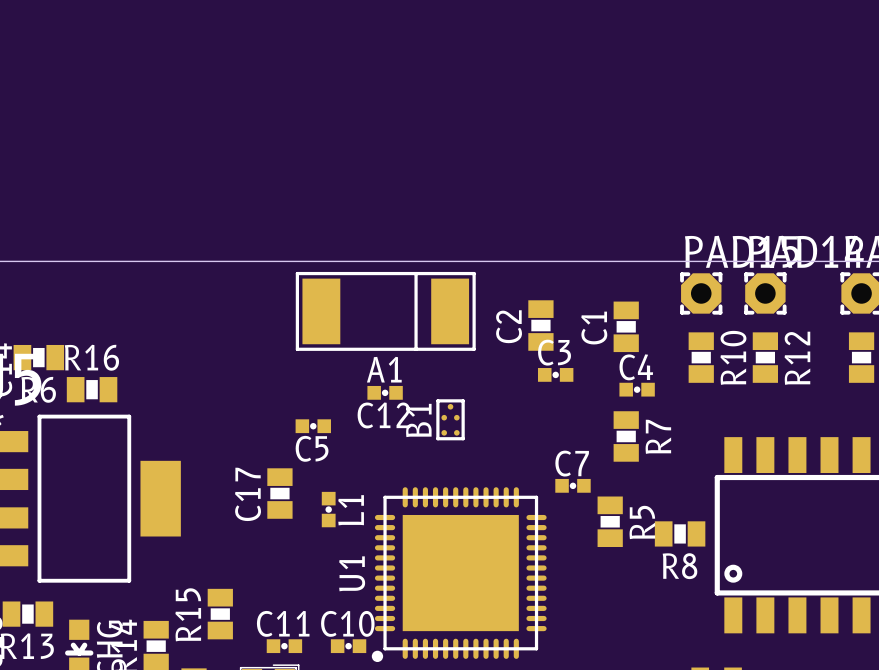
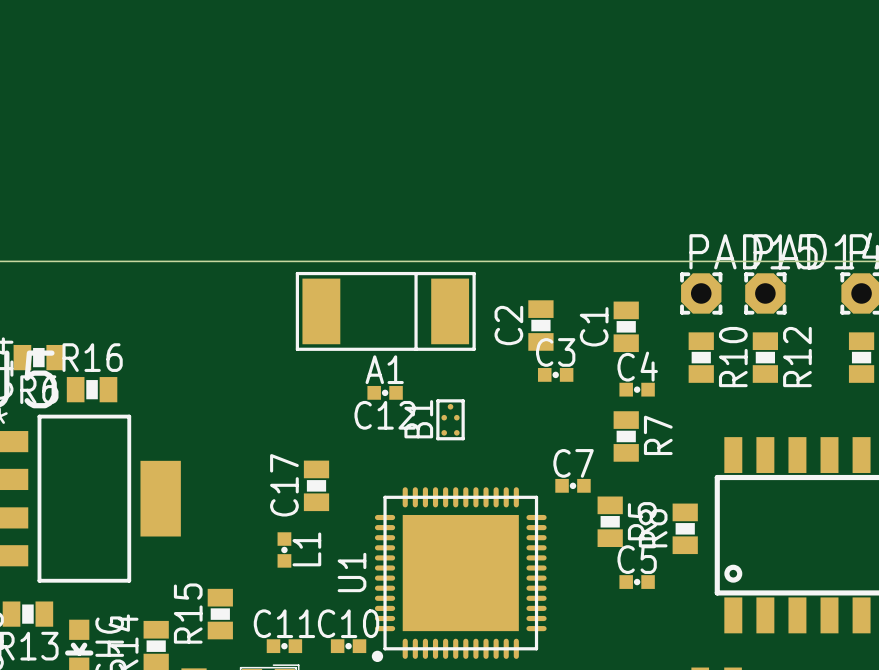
C5 position: (313, 426) -> (637, 582)
C5 name position: C5 (312, 448) -> C5 (637, 559)
C17 position: (279, 493) -> (316, 485)
L1 position: (328, 509) -> (284, 549)
R8 rotation: 0° (680, 533) -> 90° clockwise (685, 528)

